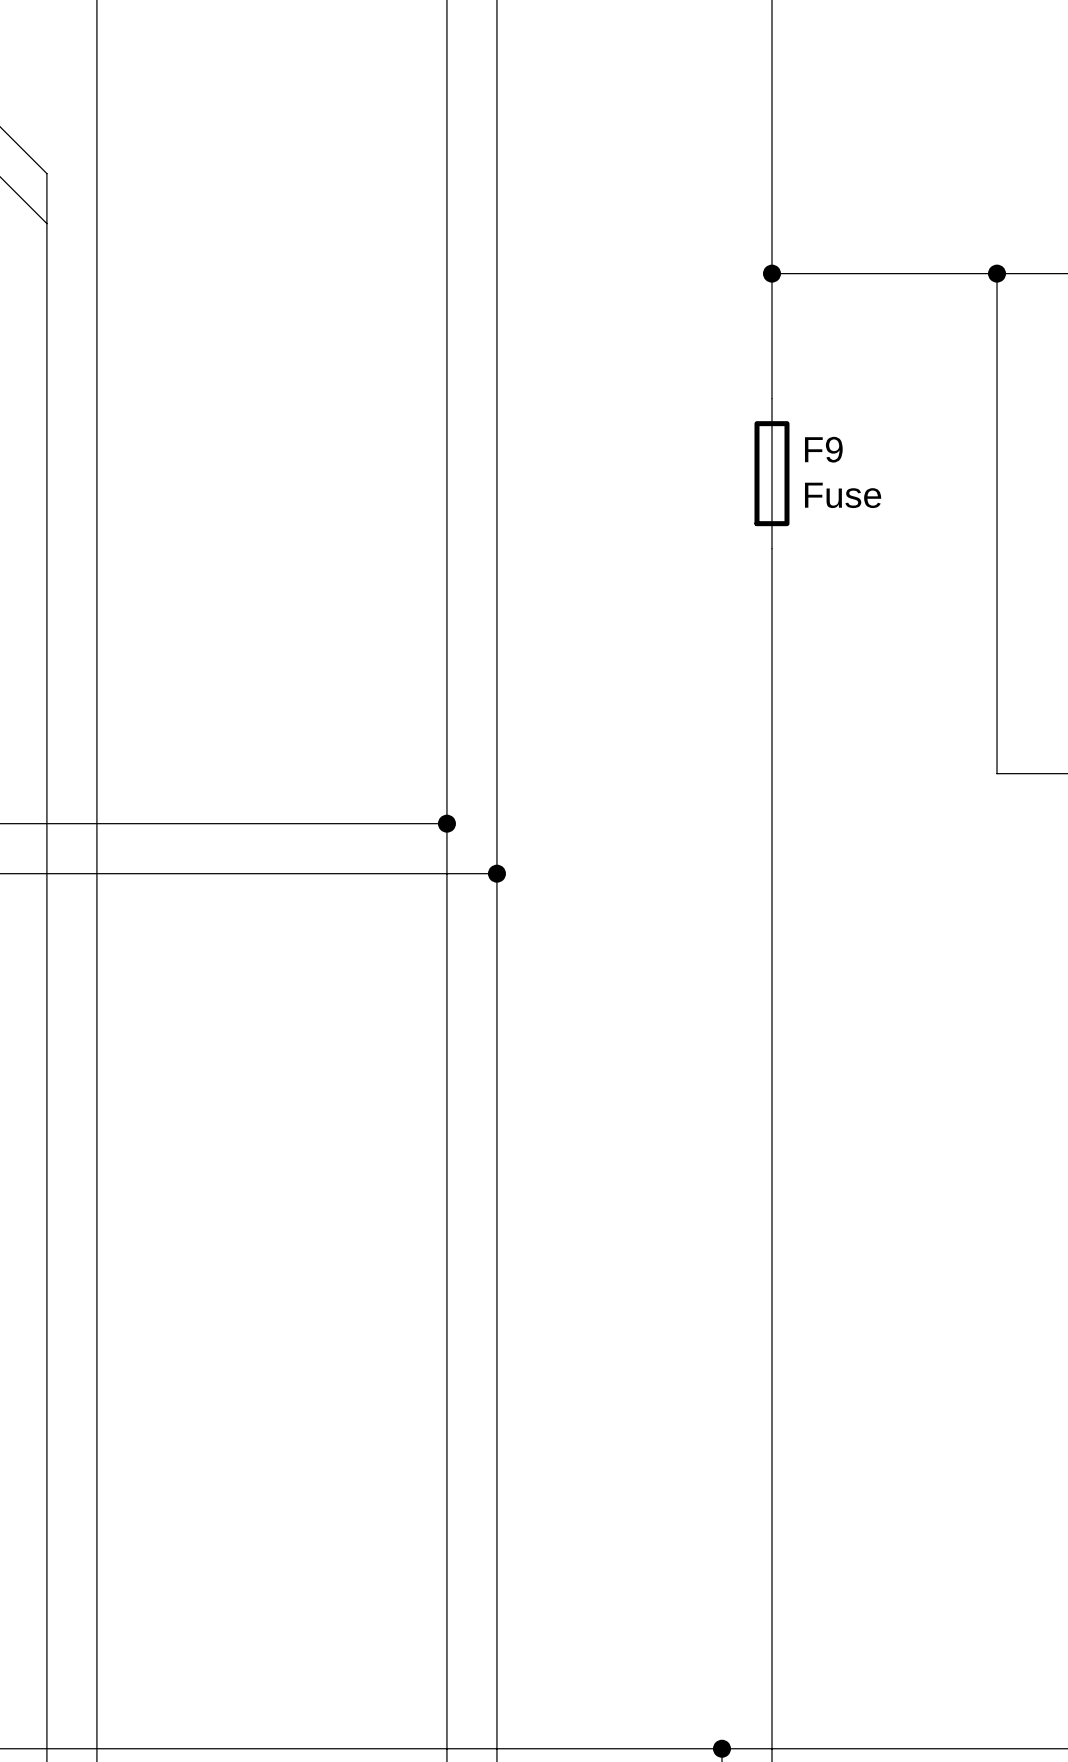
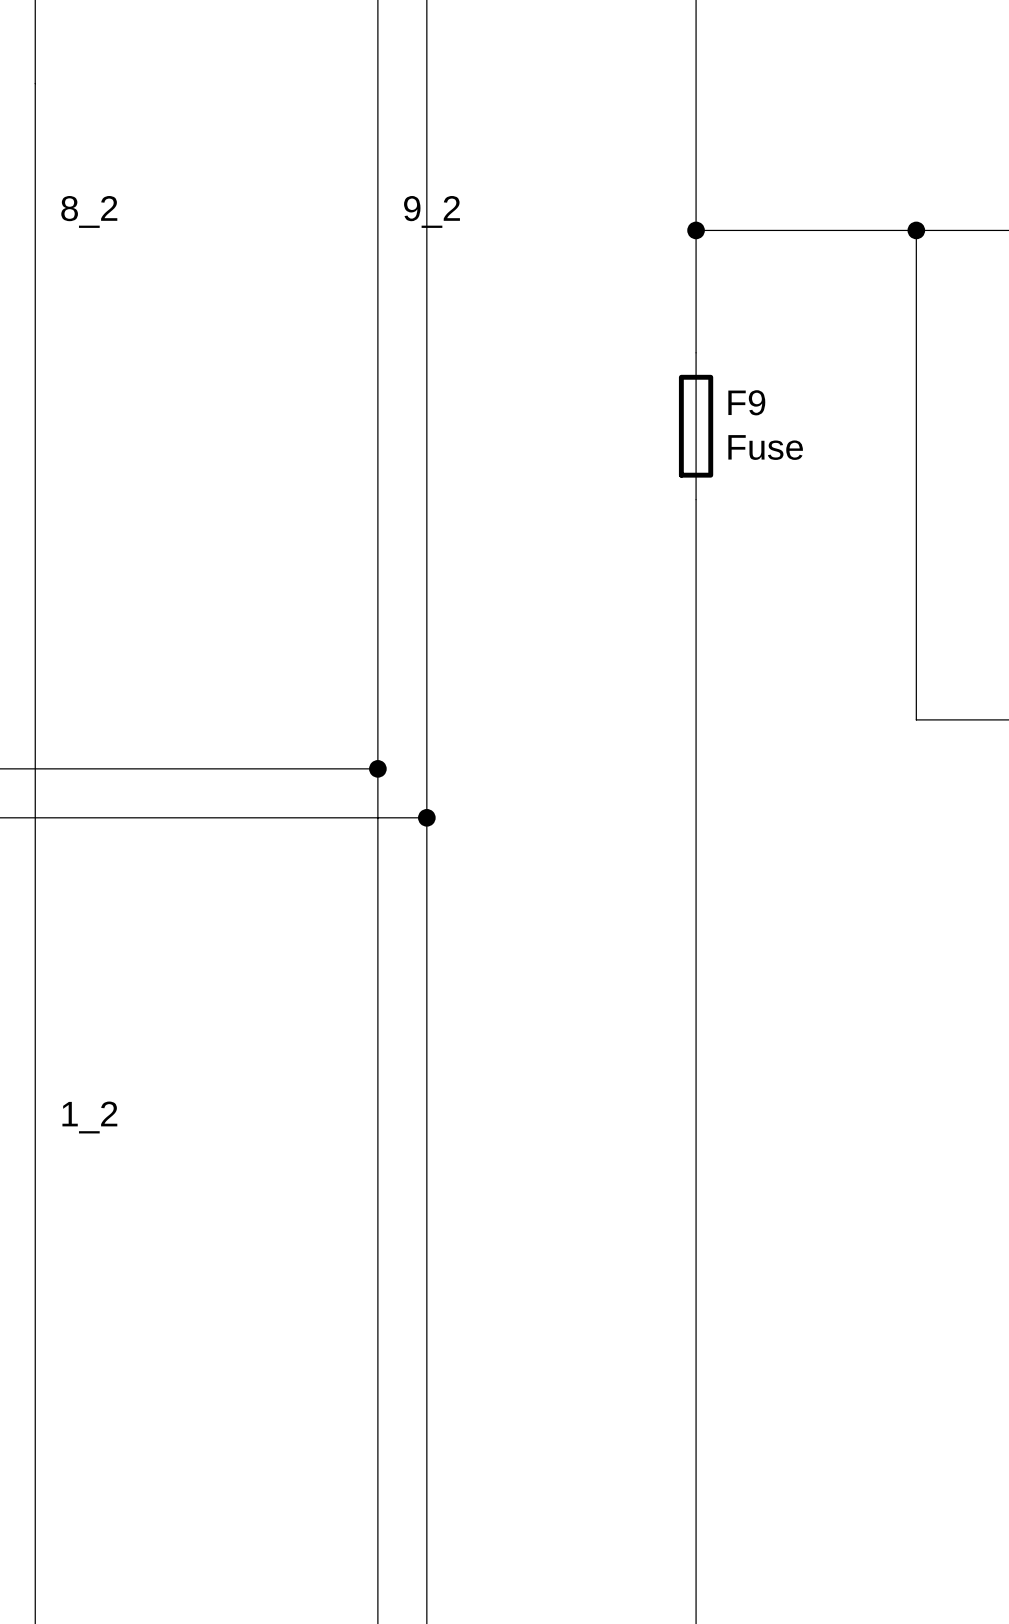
label: none -> 8_2 (89, 211)
label: none -> 9_2 (431, 211)
label: none -> 1_2 (89, 1117)

